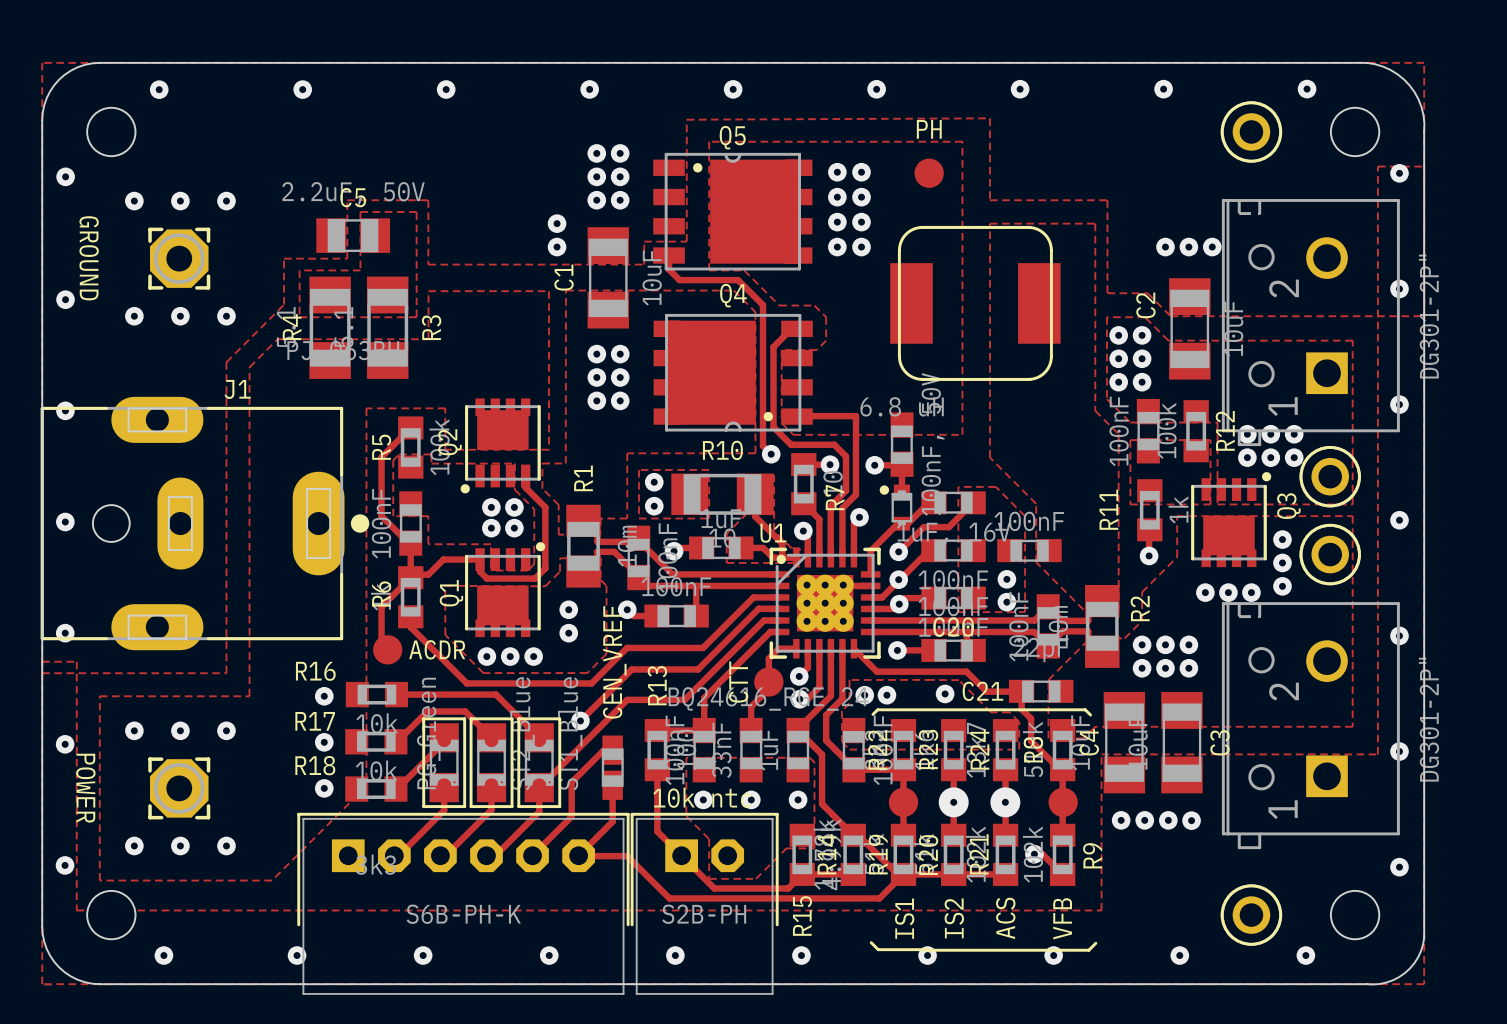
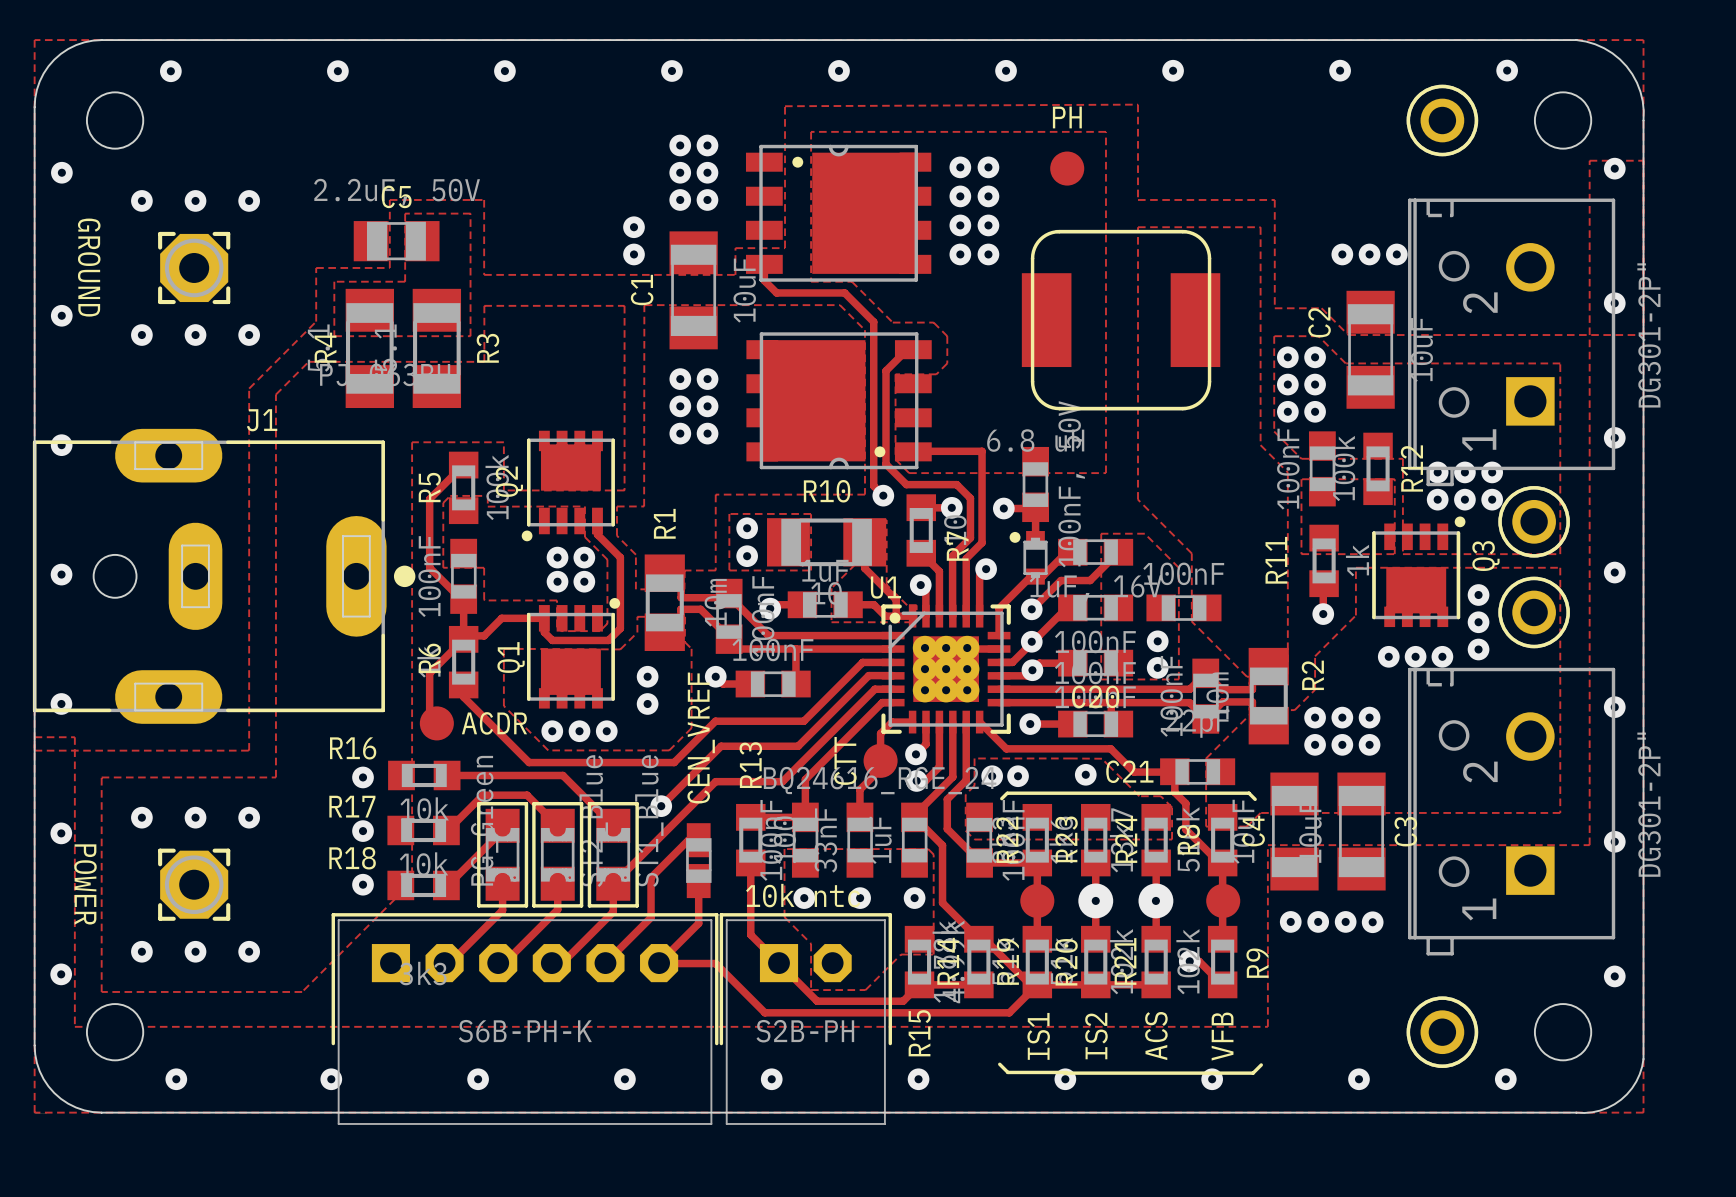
Q5 name: Q5 (732, 137) -> none
Q4 name: Q4 (733, 295) -> none

